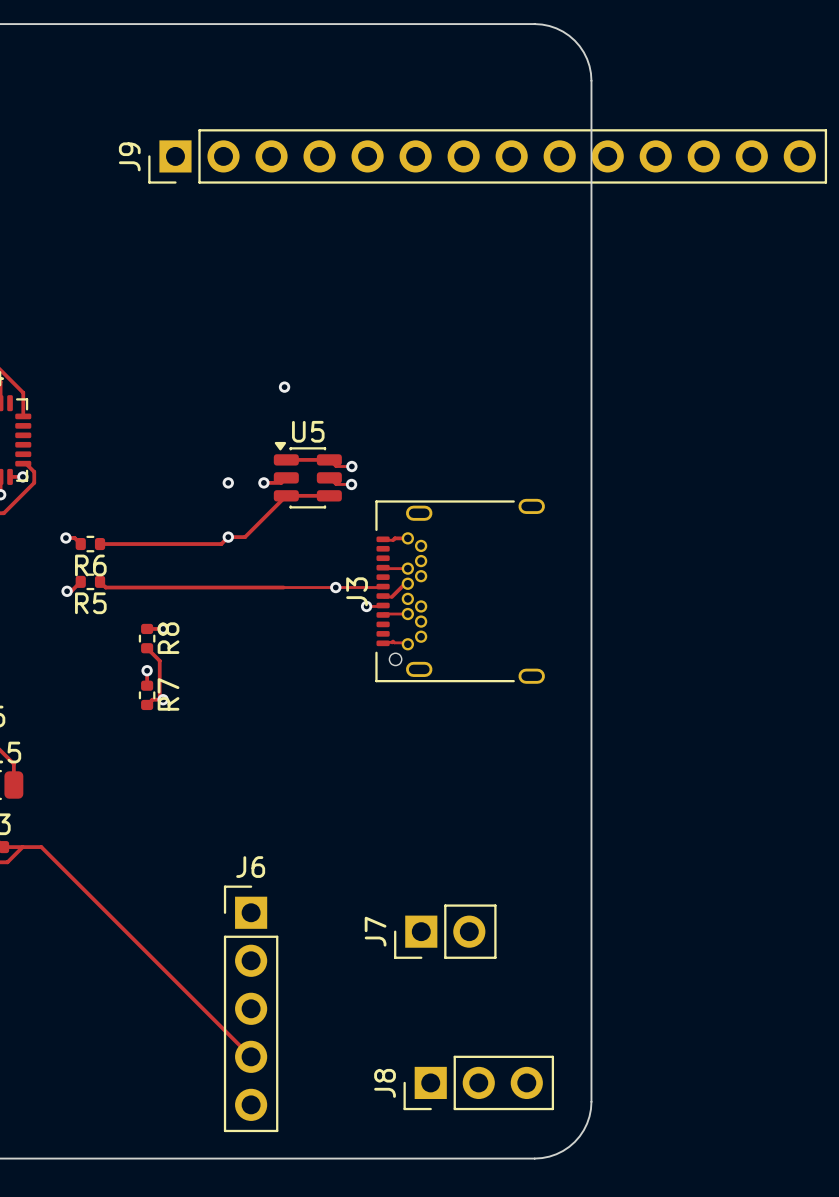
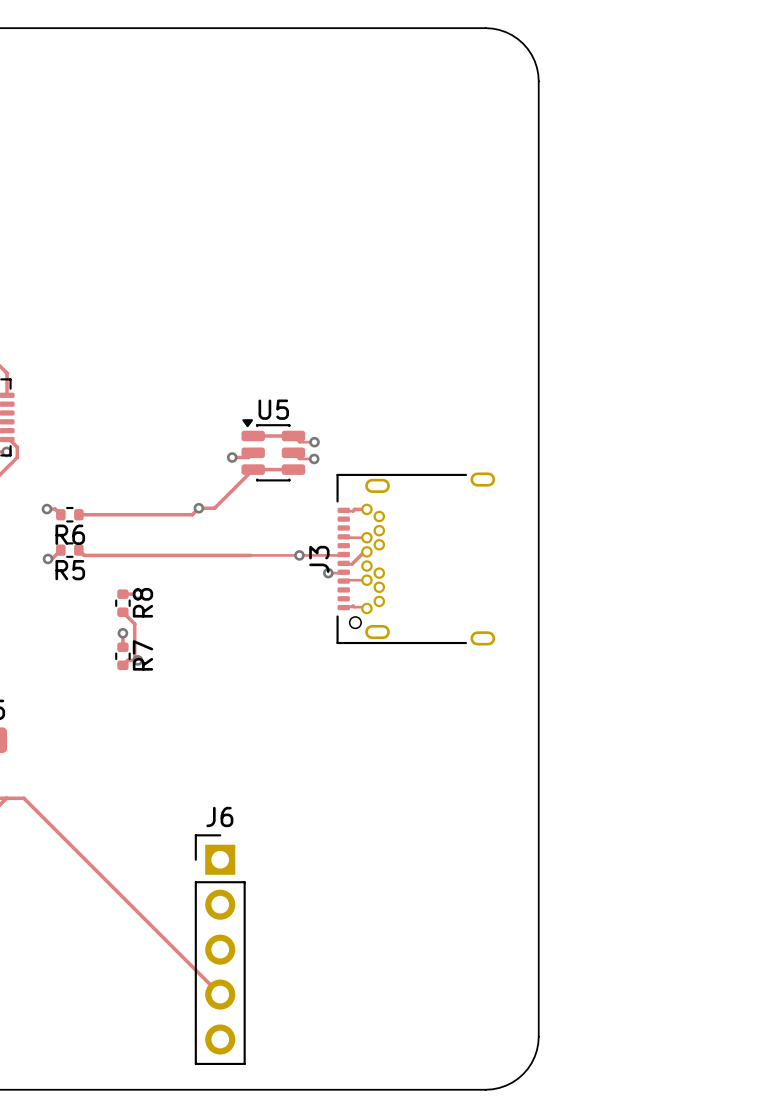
J9: (487, 156) -> none
via: (284, 387) -> none
via: (228, 482) -> none
J7: (445, 931) -> none
J8: (478, 1082) -> none

